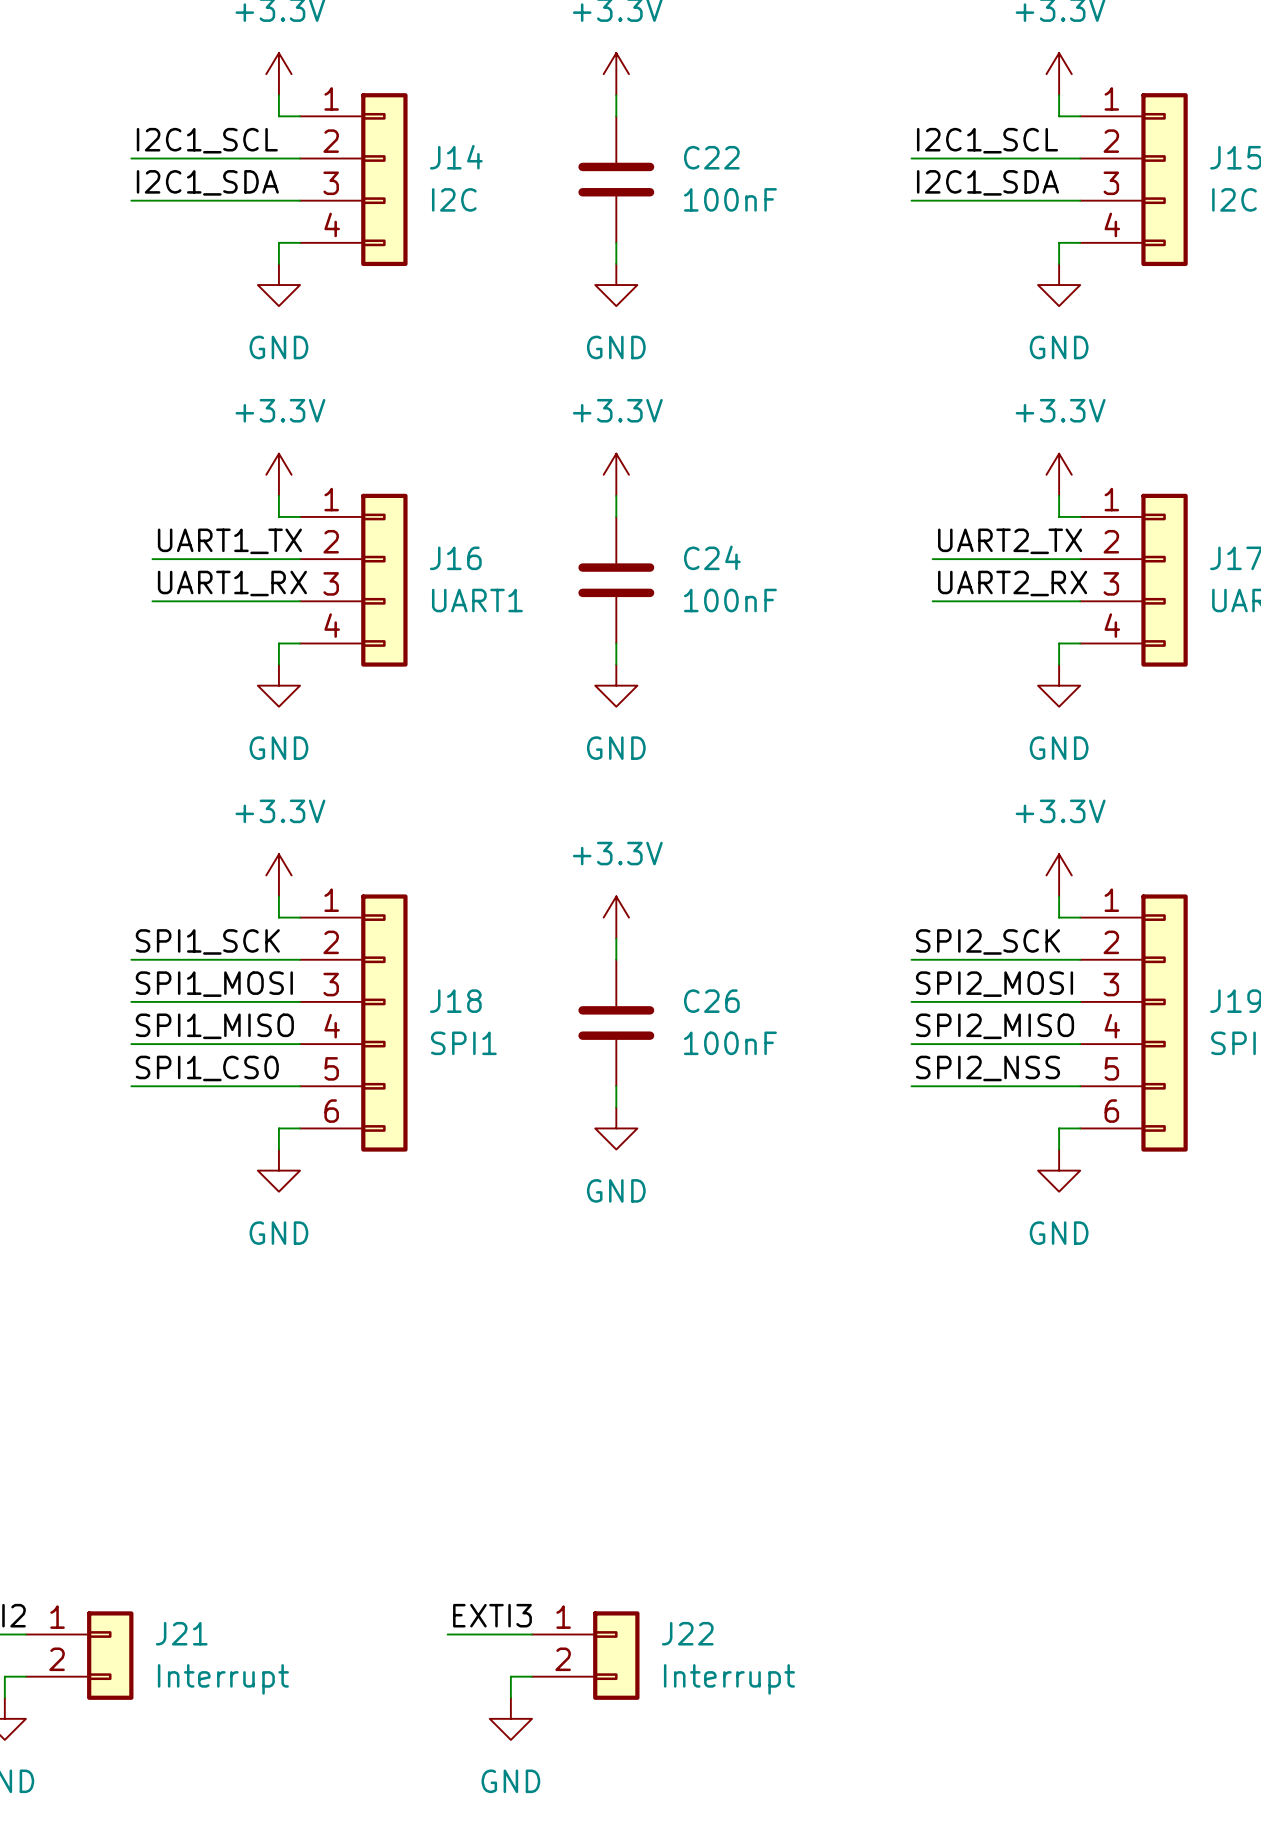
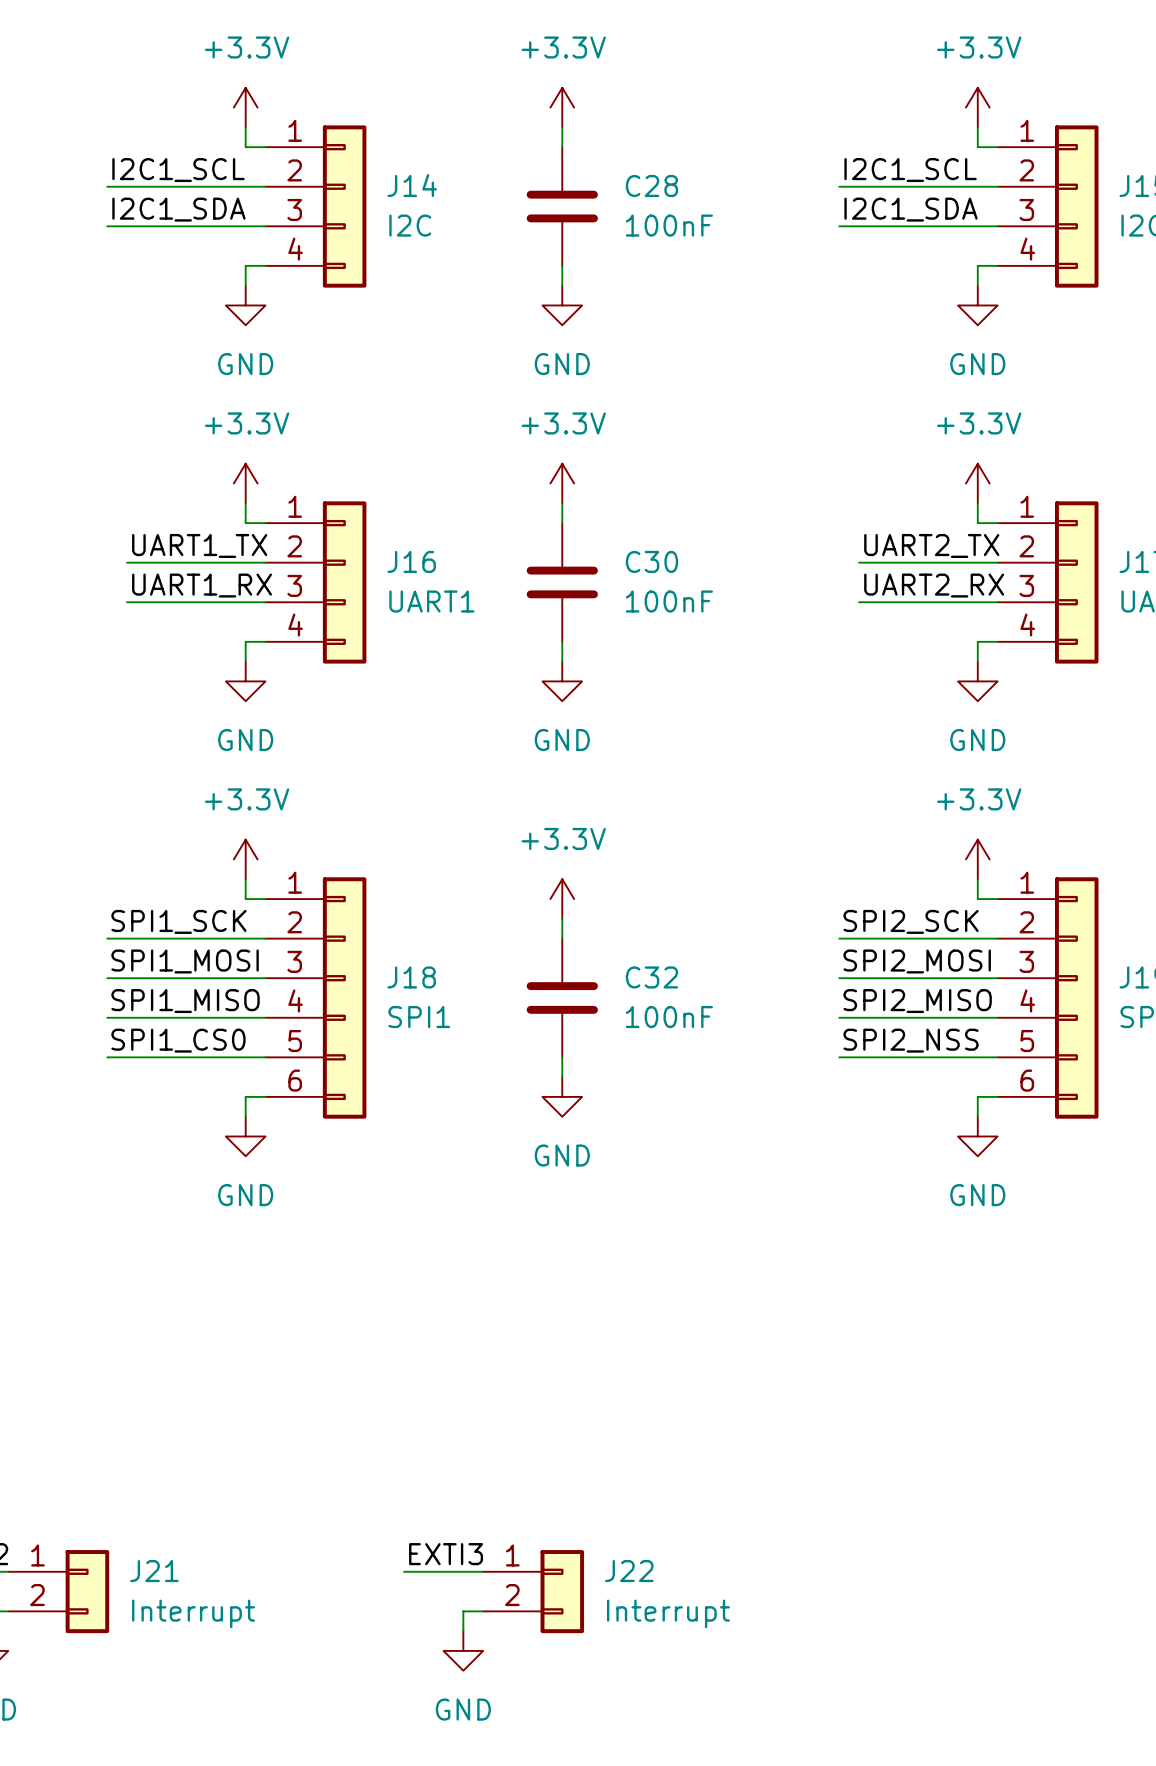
C22 name: C22 (711, 157) -> C28 (651, 186)
C24 name: C24 (712, 557) -> C30 (651, 561)
C26 name: C26 (711, 1001) -> C32 (651, 977)

